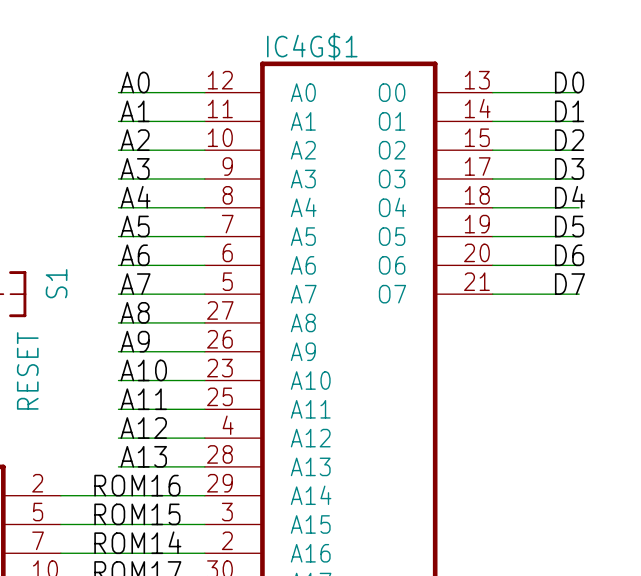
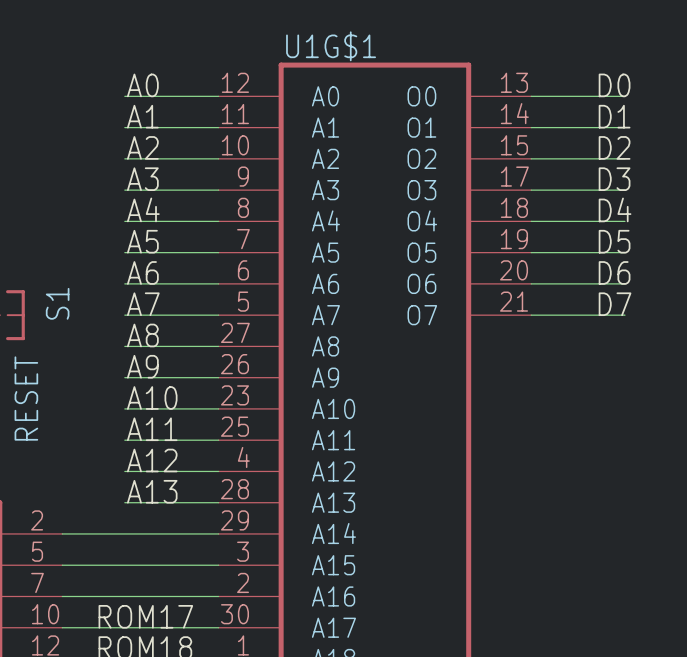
IC4G$1 name: IC4G$1 (312, 46) -> U1G$1 (331, 46)
label: ROM16 (137, 485) -> none
label: ROM15 (137, 514) -> none
label: ROM14 (137, 542) -> none

